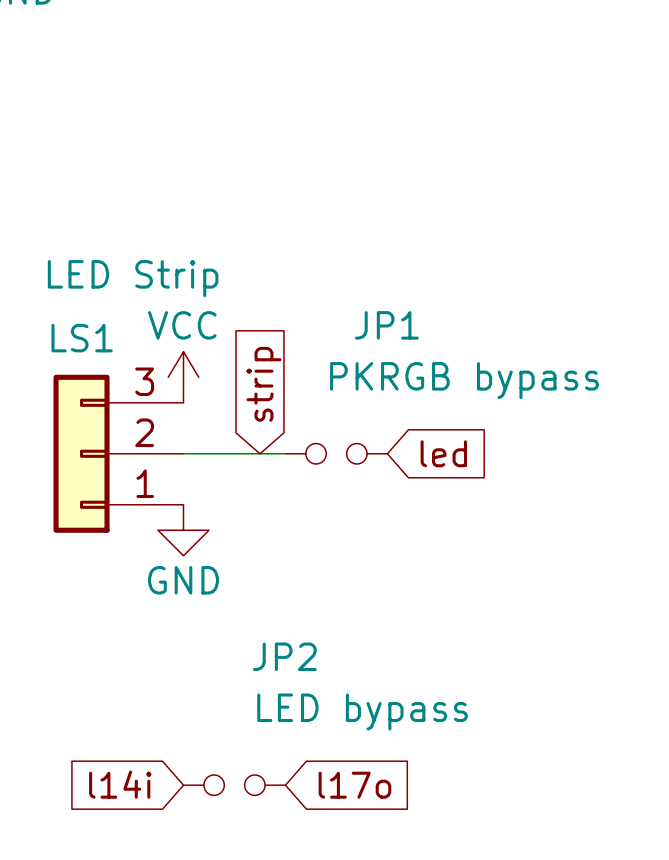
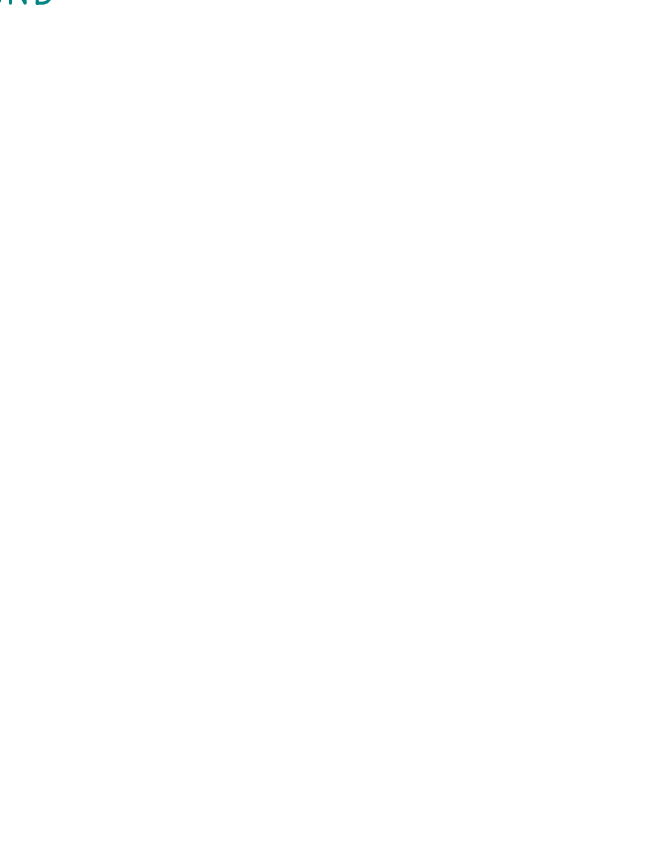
power symbol: VCC (183, 377) -> none
global label: strip (263, 384) -> none
LS1: LED Strip (118, 453) -> none
wire: (183, 453) (285, 453) -> none
JP1: PKRGB bypass (336, 453) -> none
global label: led (443, 453) -> none
power symbol: GND (183, 530) -> none
global label: l14i (120, 784) -> none
JP2: LED bypass (234, 785) -> none
global label: l17o (354, 785) -> none

